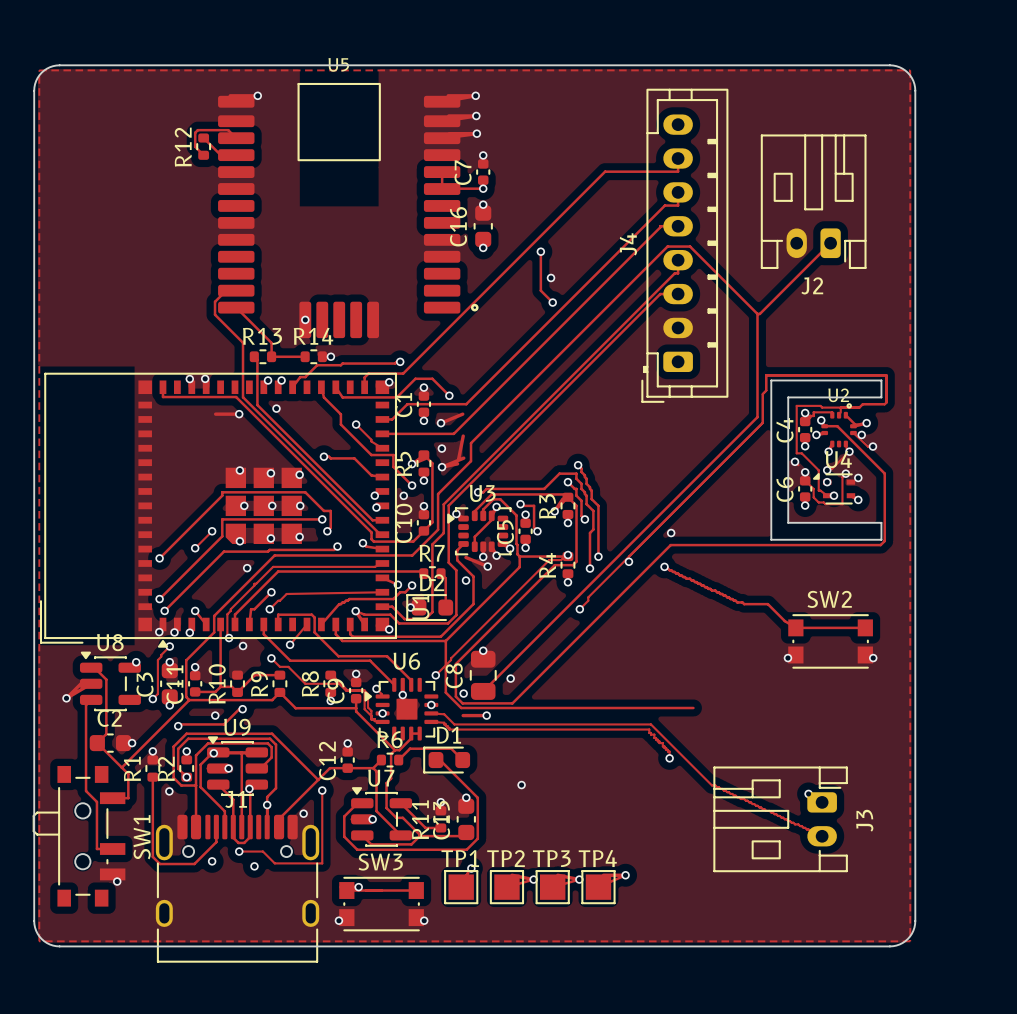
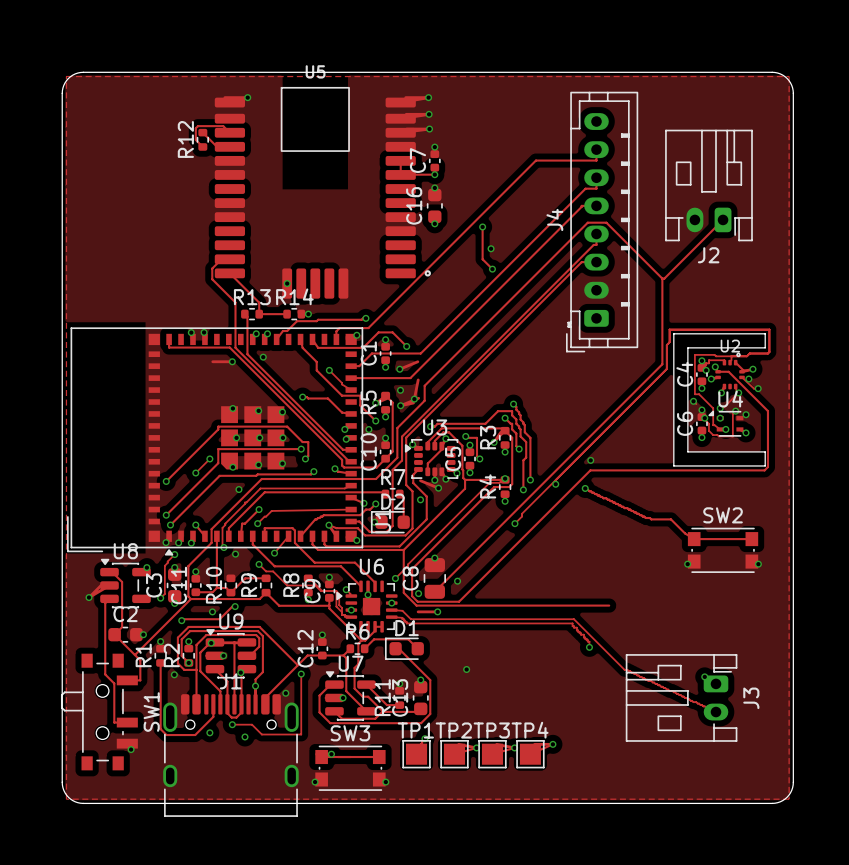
via: none -> (706, 370)
via: none -> (414, 399)
via: none -> (704, 418)

